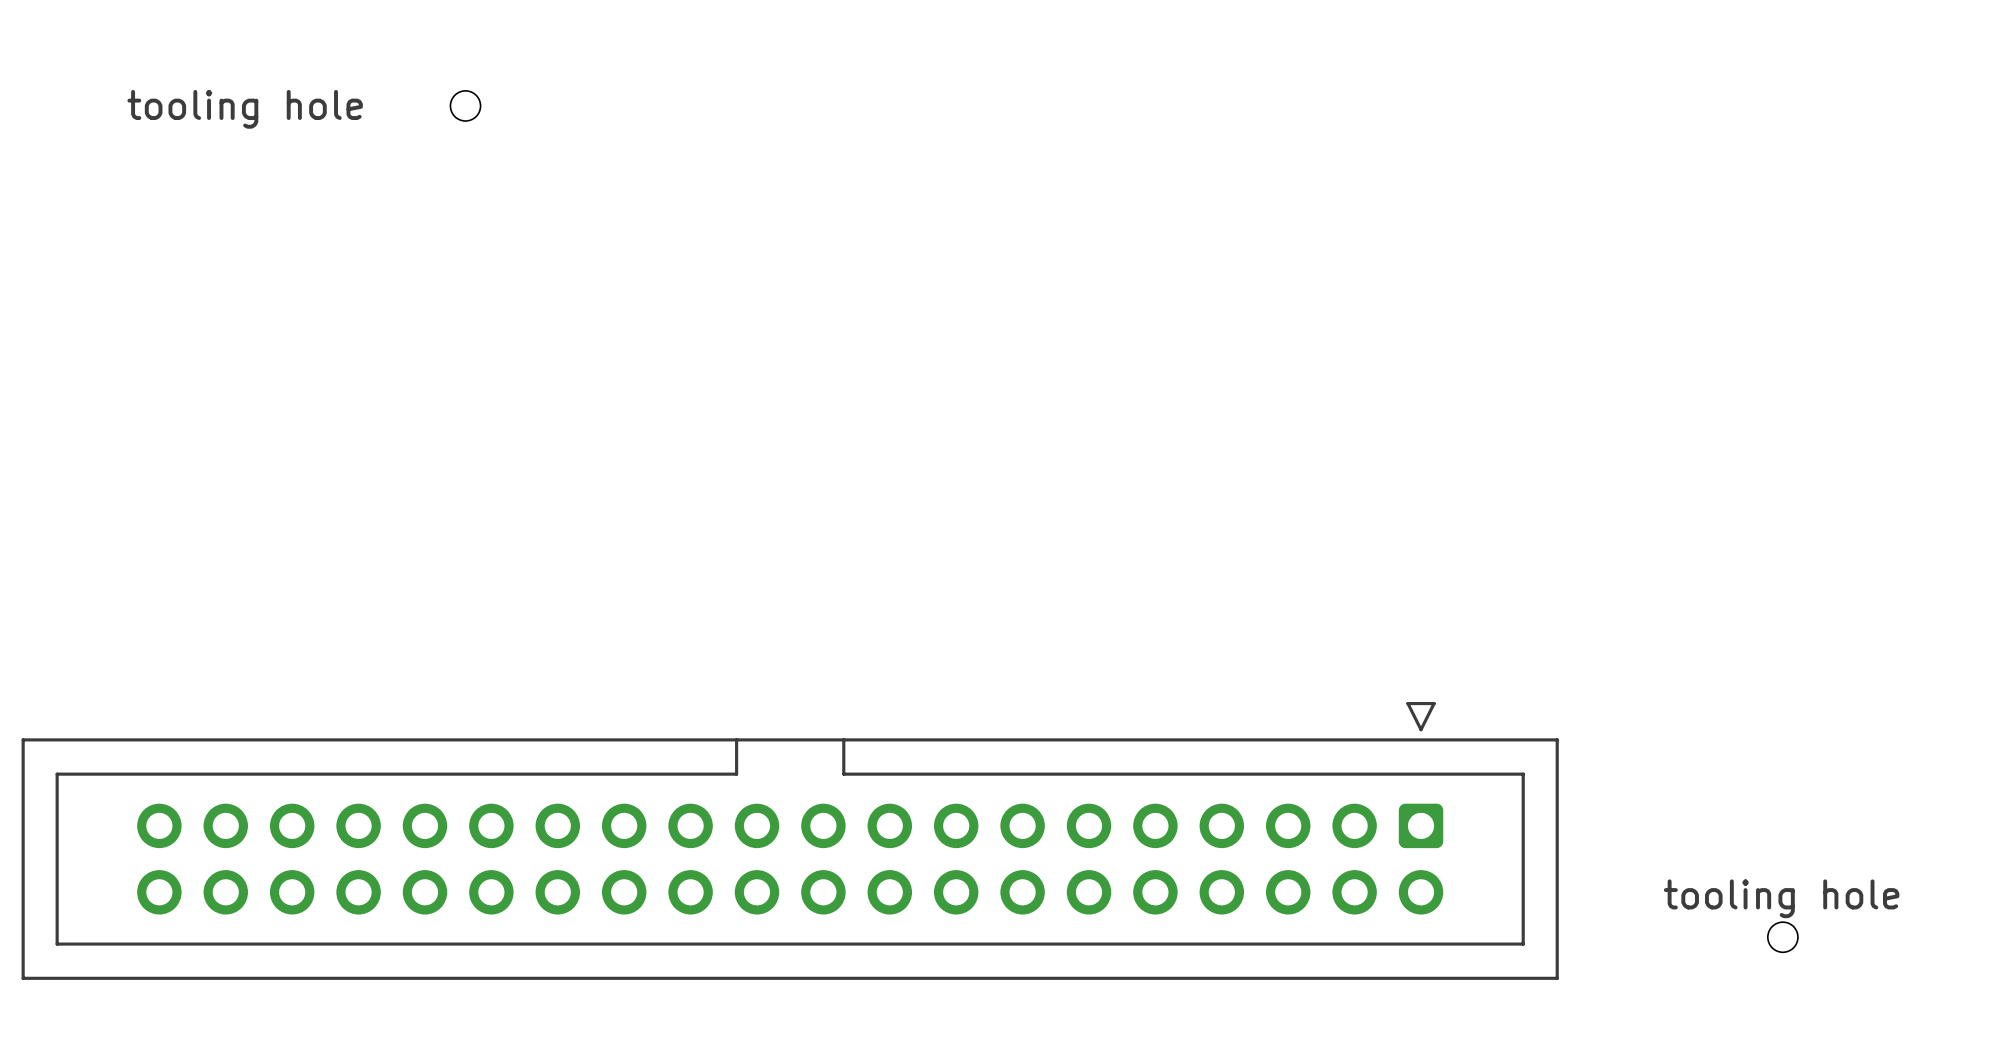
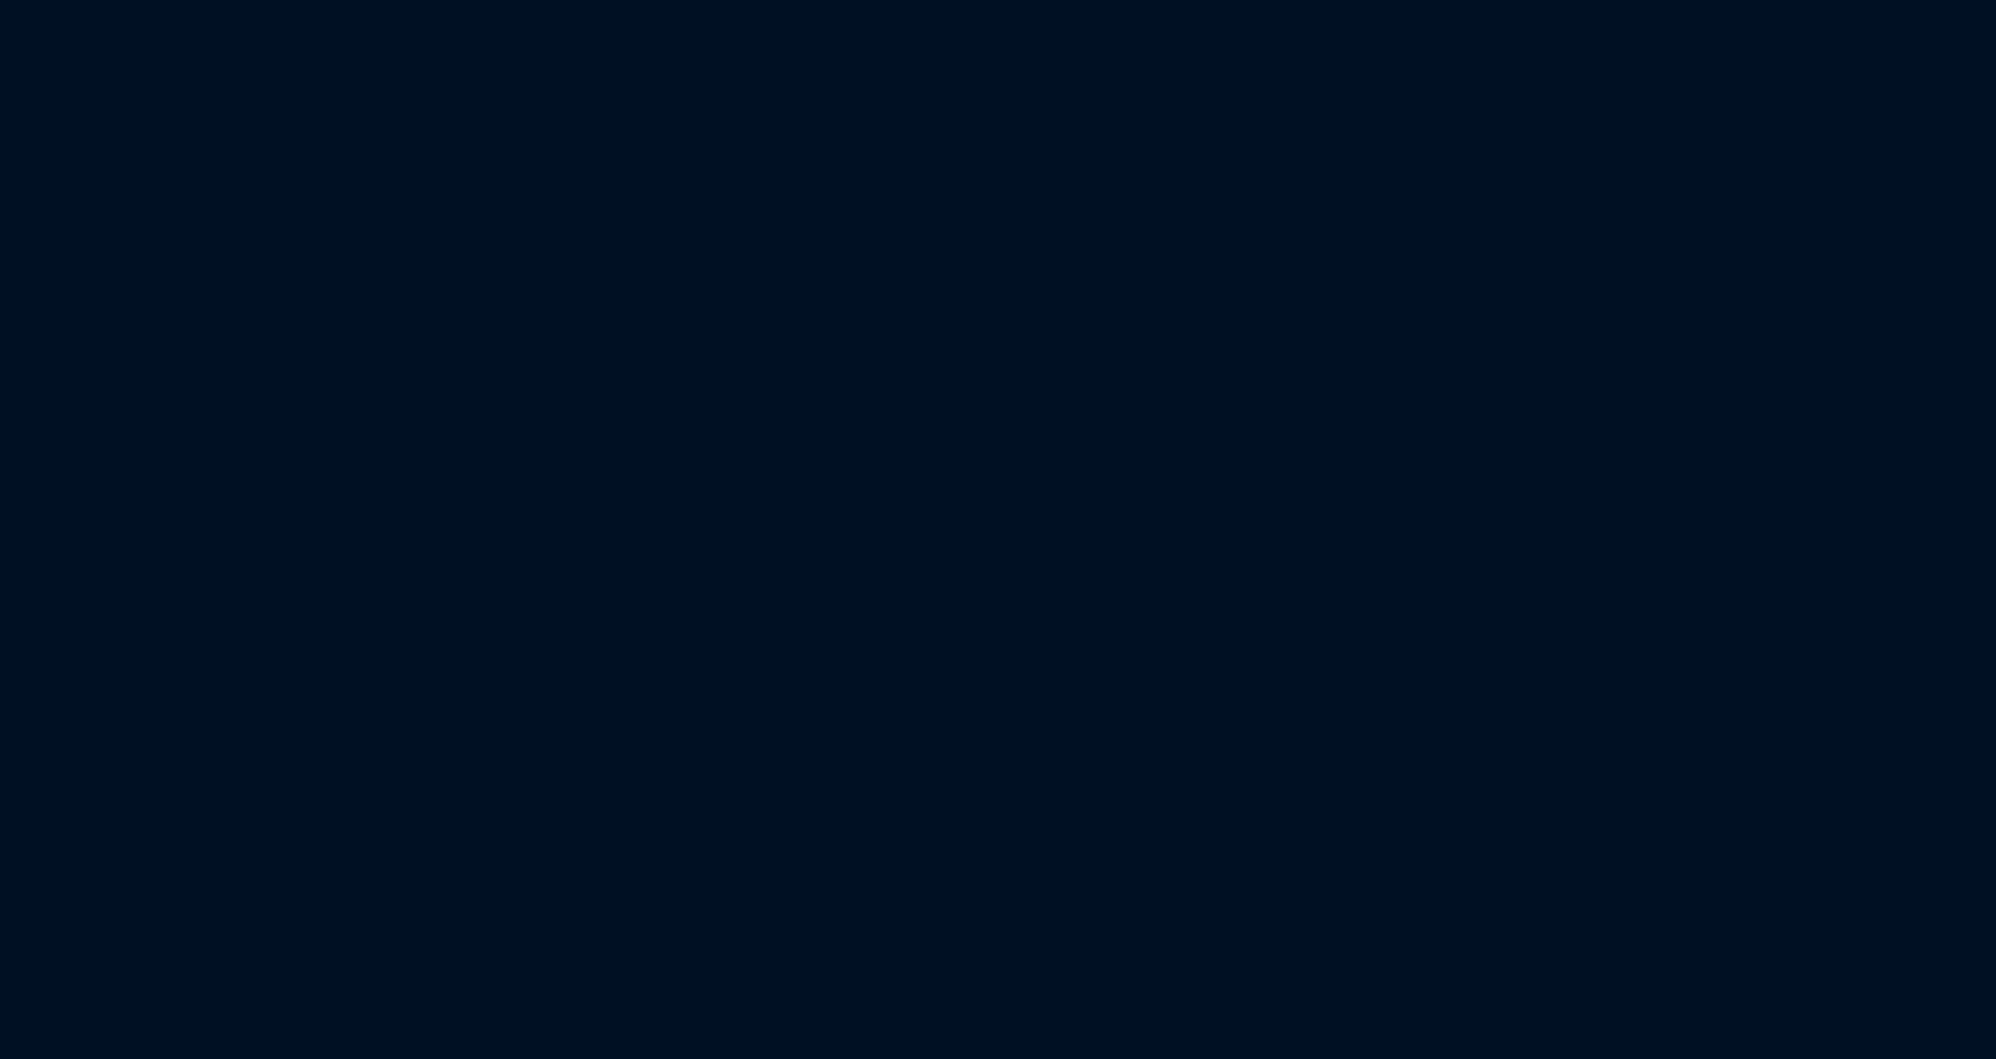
part: (465, 105) -> none
part: (790, 840) -> none
part: (1782, 937) -> none

